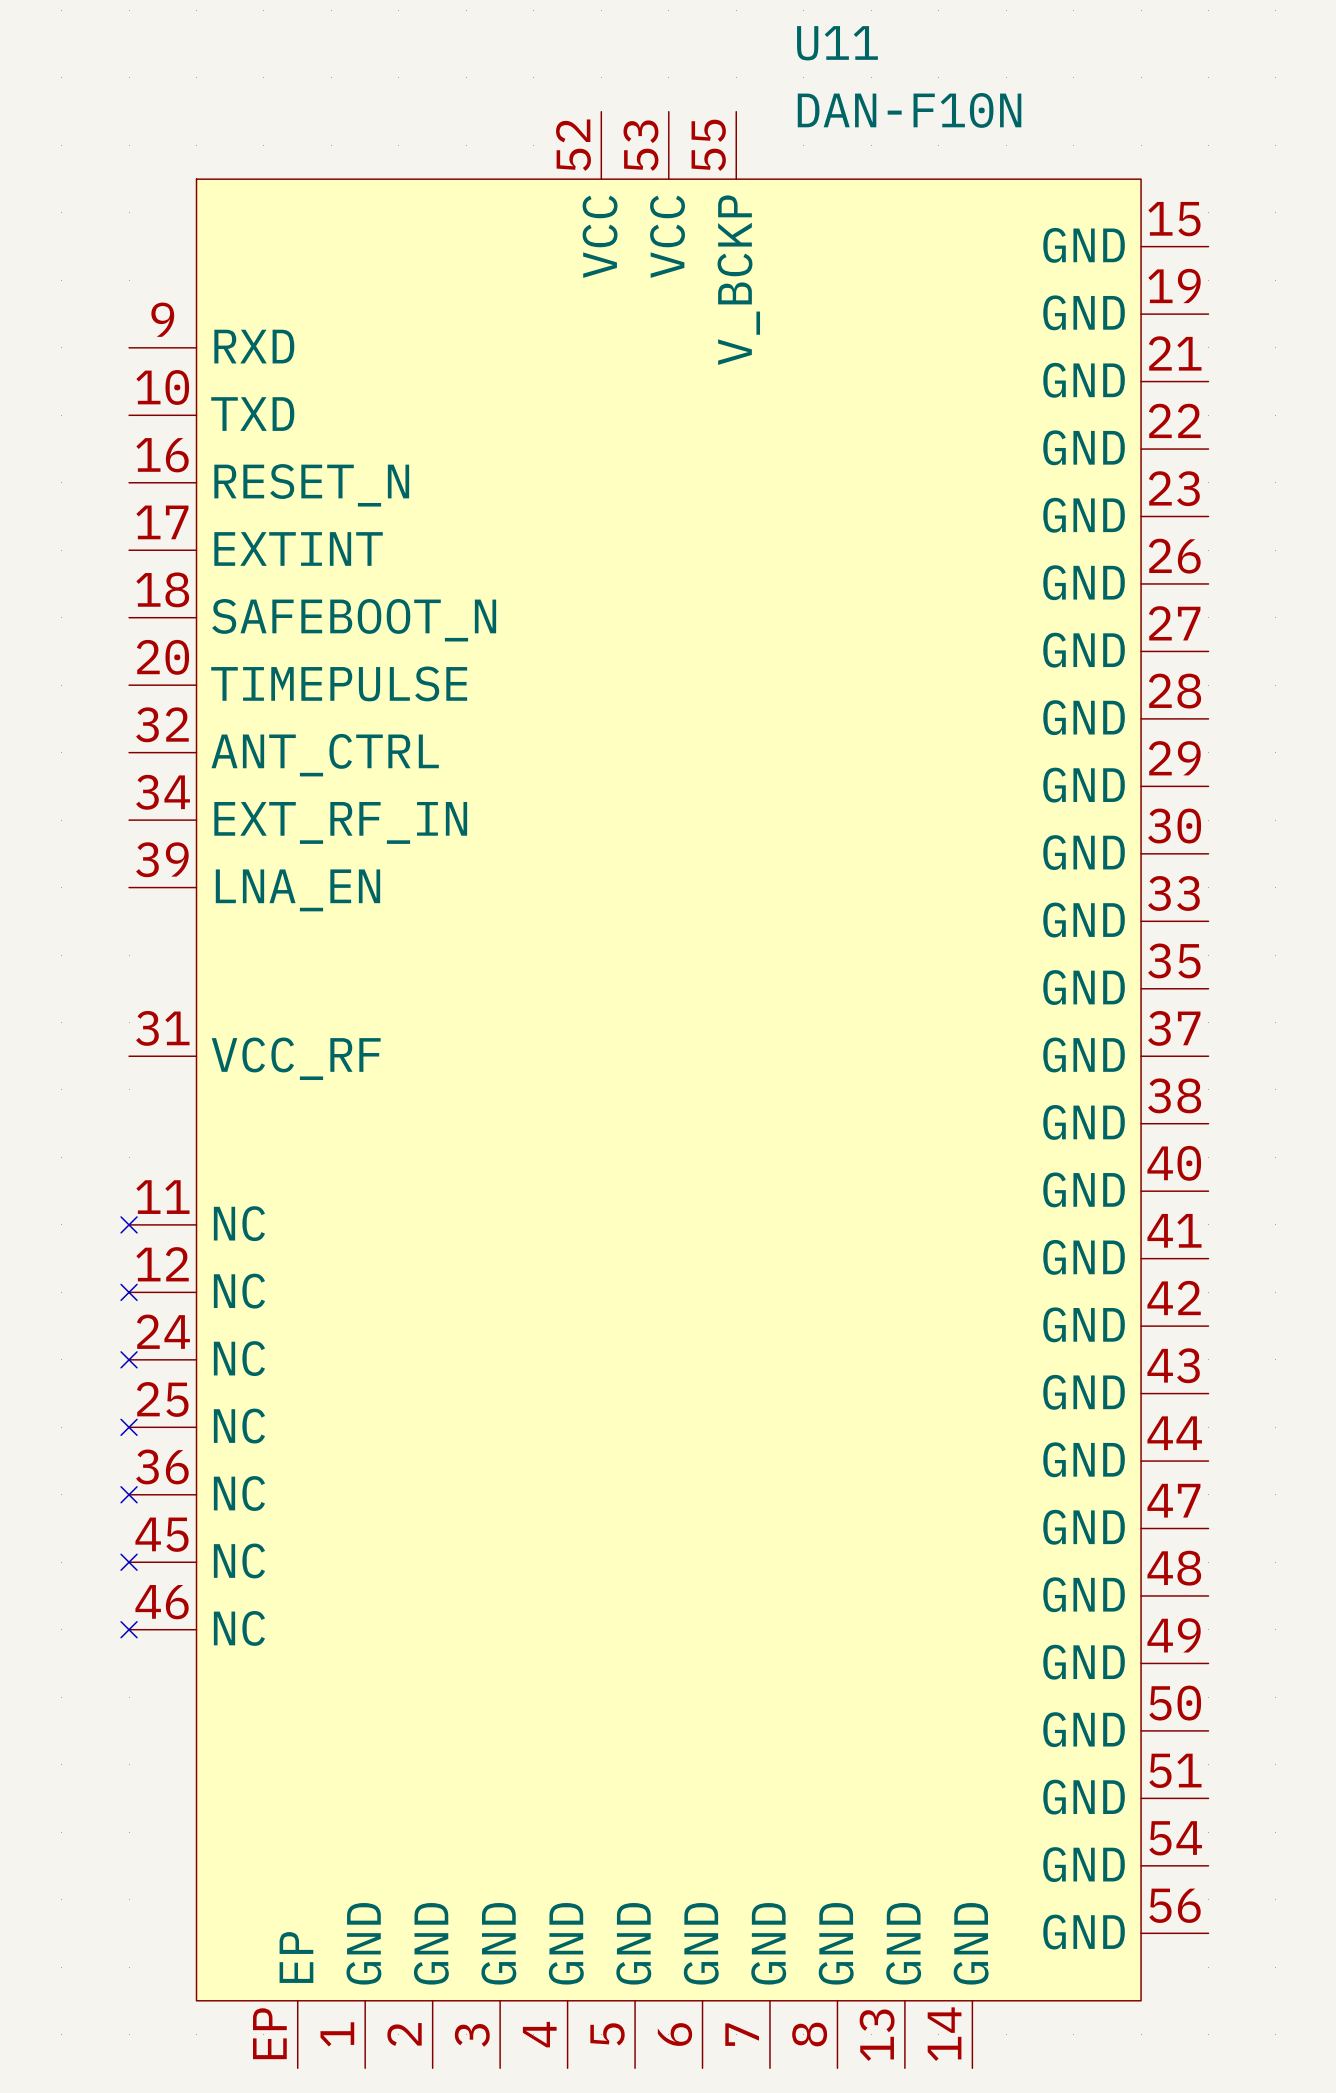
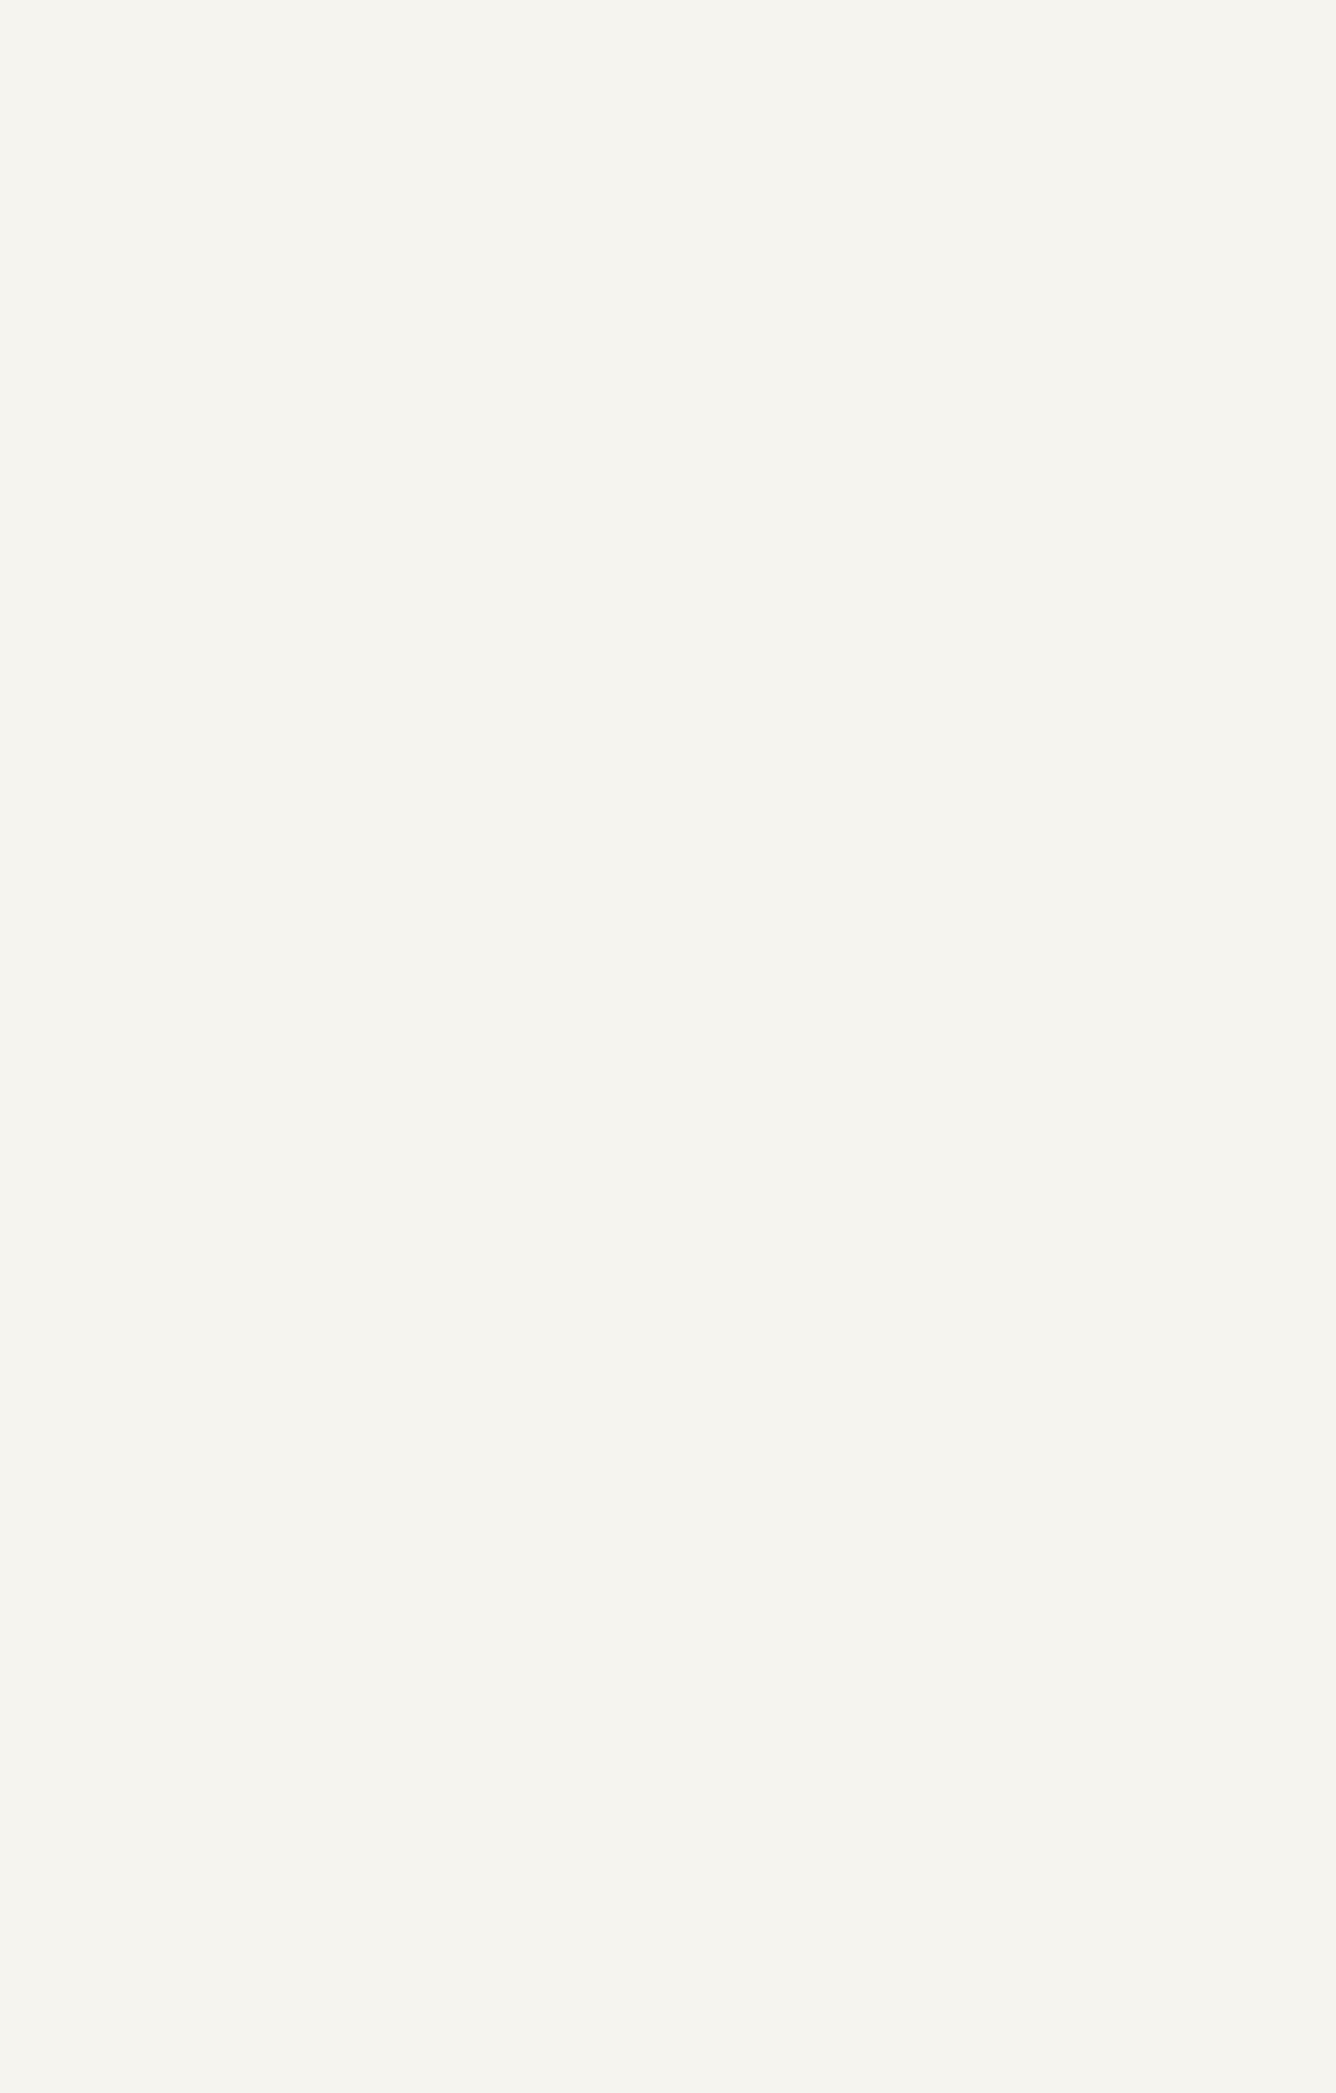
U11: DAN-F10N (664, 1089) -> none

